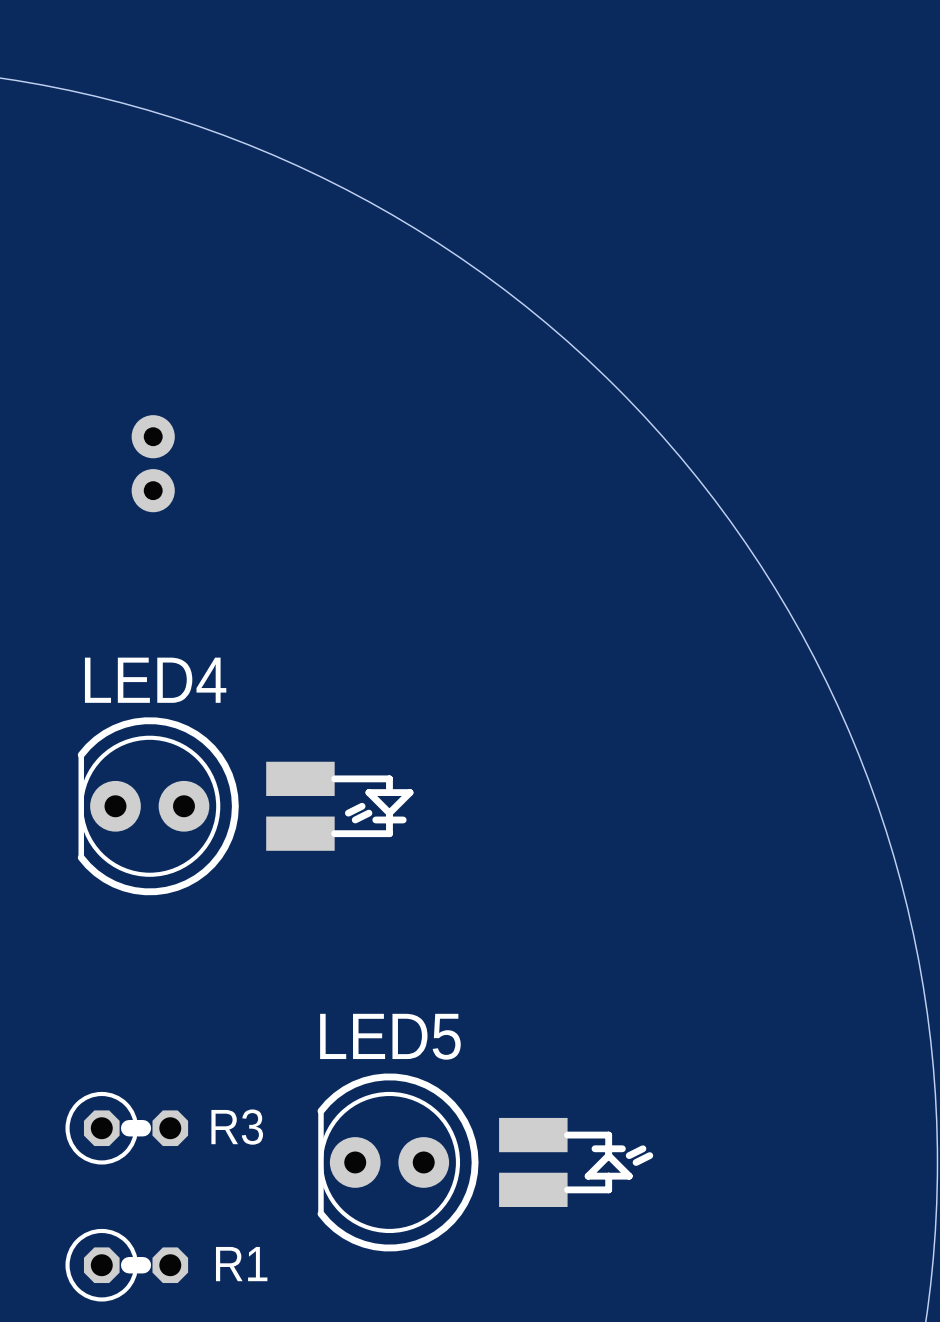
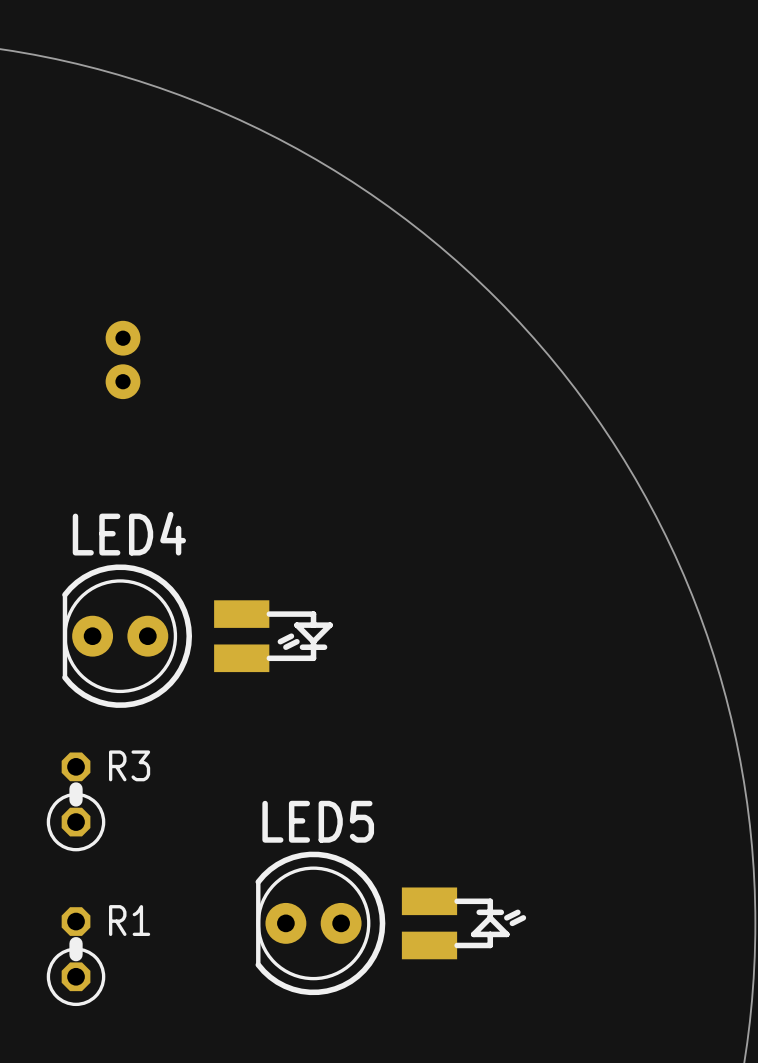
R3 name position: R3 (237, 1127) -> R3 (129, 765)
R3 rotation: 0° (126, 1128) -> 90° counterclockwise (76, 801)
R3 position: (126, 1128) -> (76, 801)
R1 name position: R1 (241, 1264) -> R1 (129, 920)
R1 rotation: 0° (126, 1265) -> 90° counterclockwise (76, 956)

